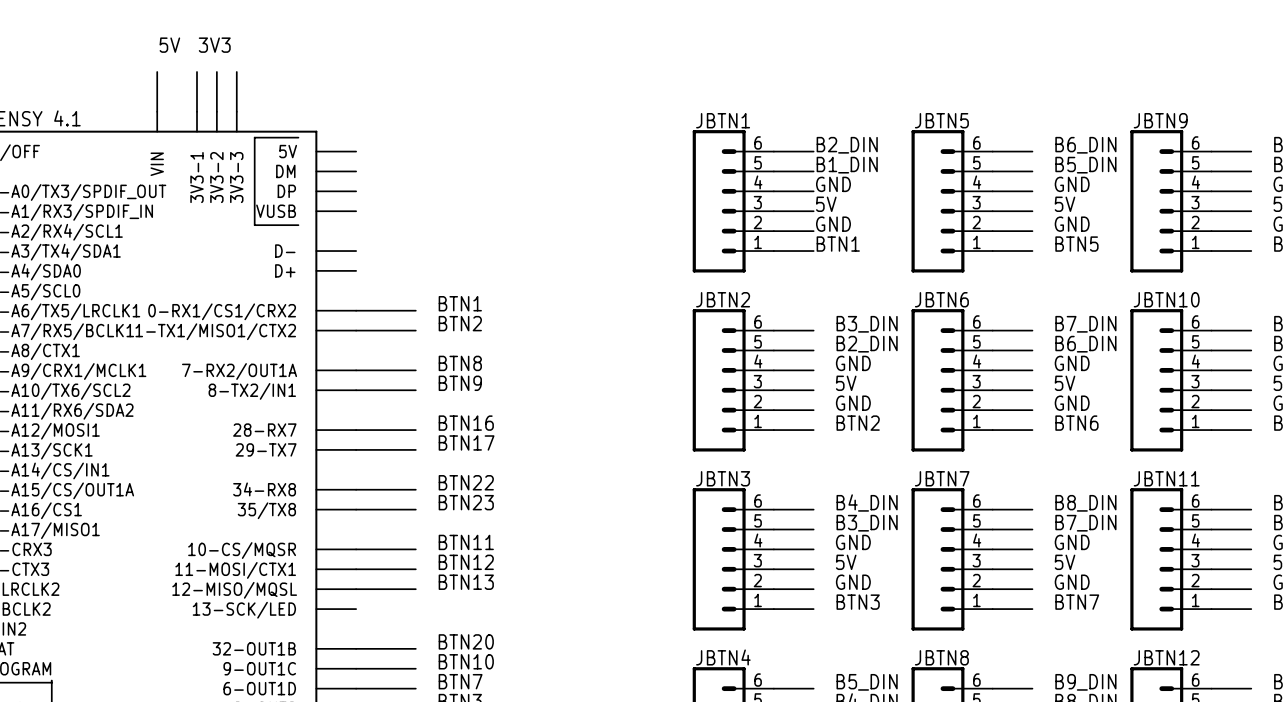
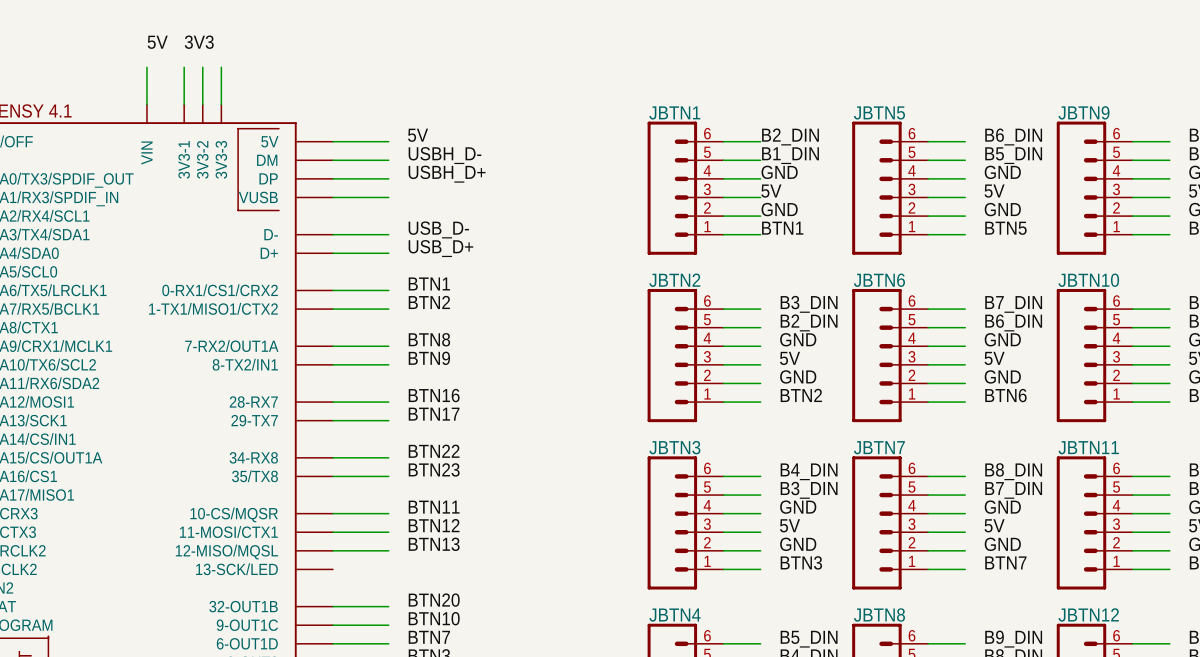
label: none -> 5V (418, 135)
wire: none -> (332, 141) (388, 141)
label: none -> USBH_D- (444, 155)
wire: none -> (332, 160) (388, 160)
label: none -> USBH_D+ (447, 174)
wire: none -> (332, 178) (388, 178)
wire: none -> (332, 197) (388, 197)
label: none -> USB_D- (438, 229)
wire: none -> (332, 234) (388, 234)
label: none -> USB_D+ (440, 248)
wire: none -> (332, 253) (388, 253)

